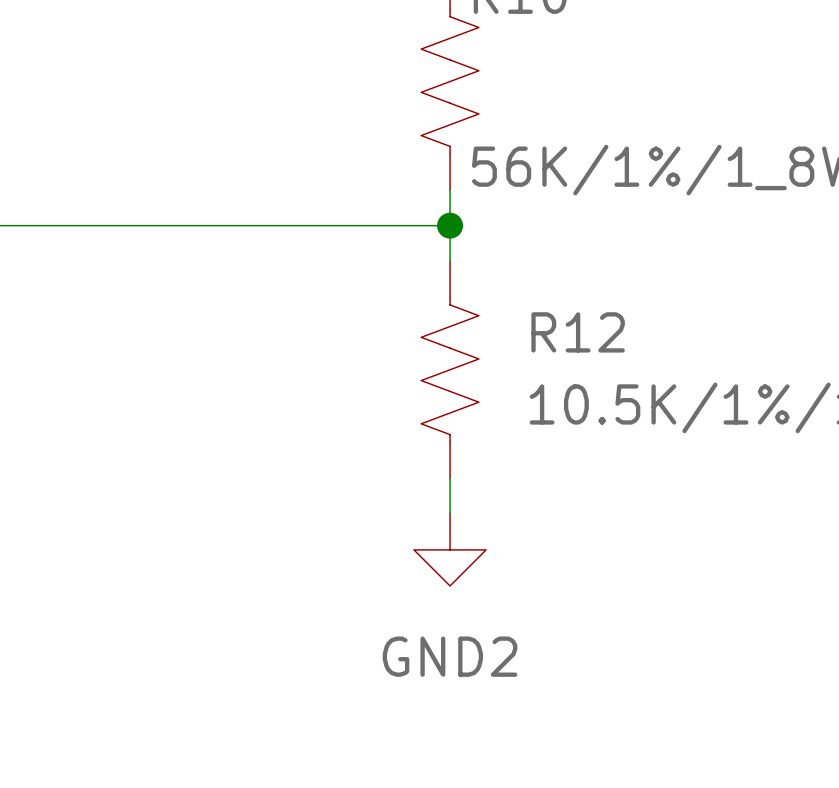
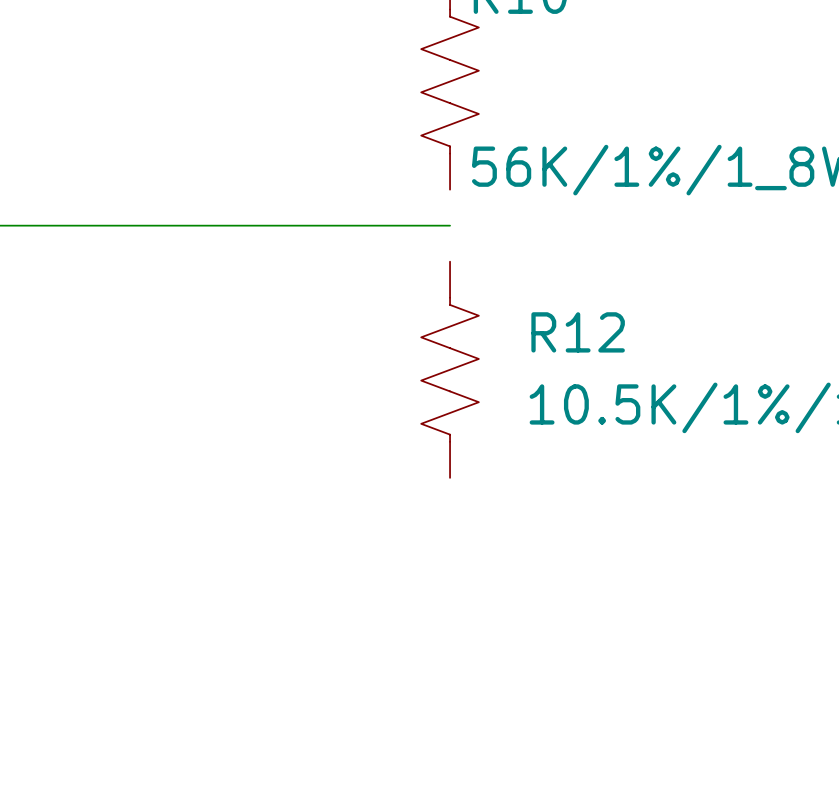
wire: (450, 189) (450, 261) -> none
junction: (450, 225) -> none
wire: (450, 477) (450, 513) -> none
power symbol: GND2 (450, 549) -> none

